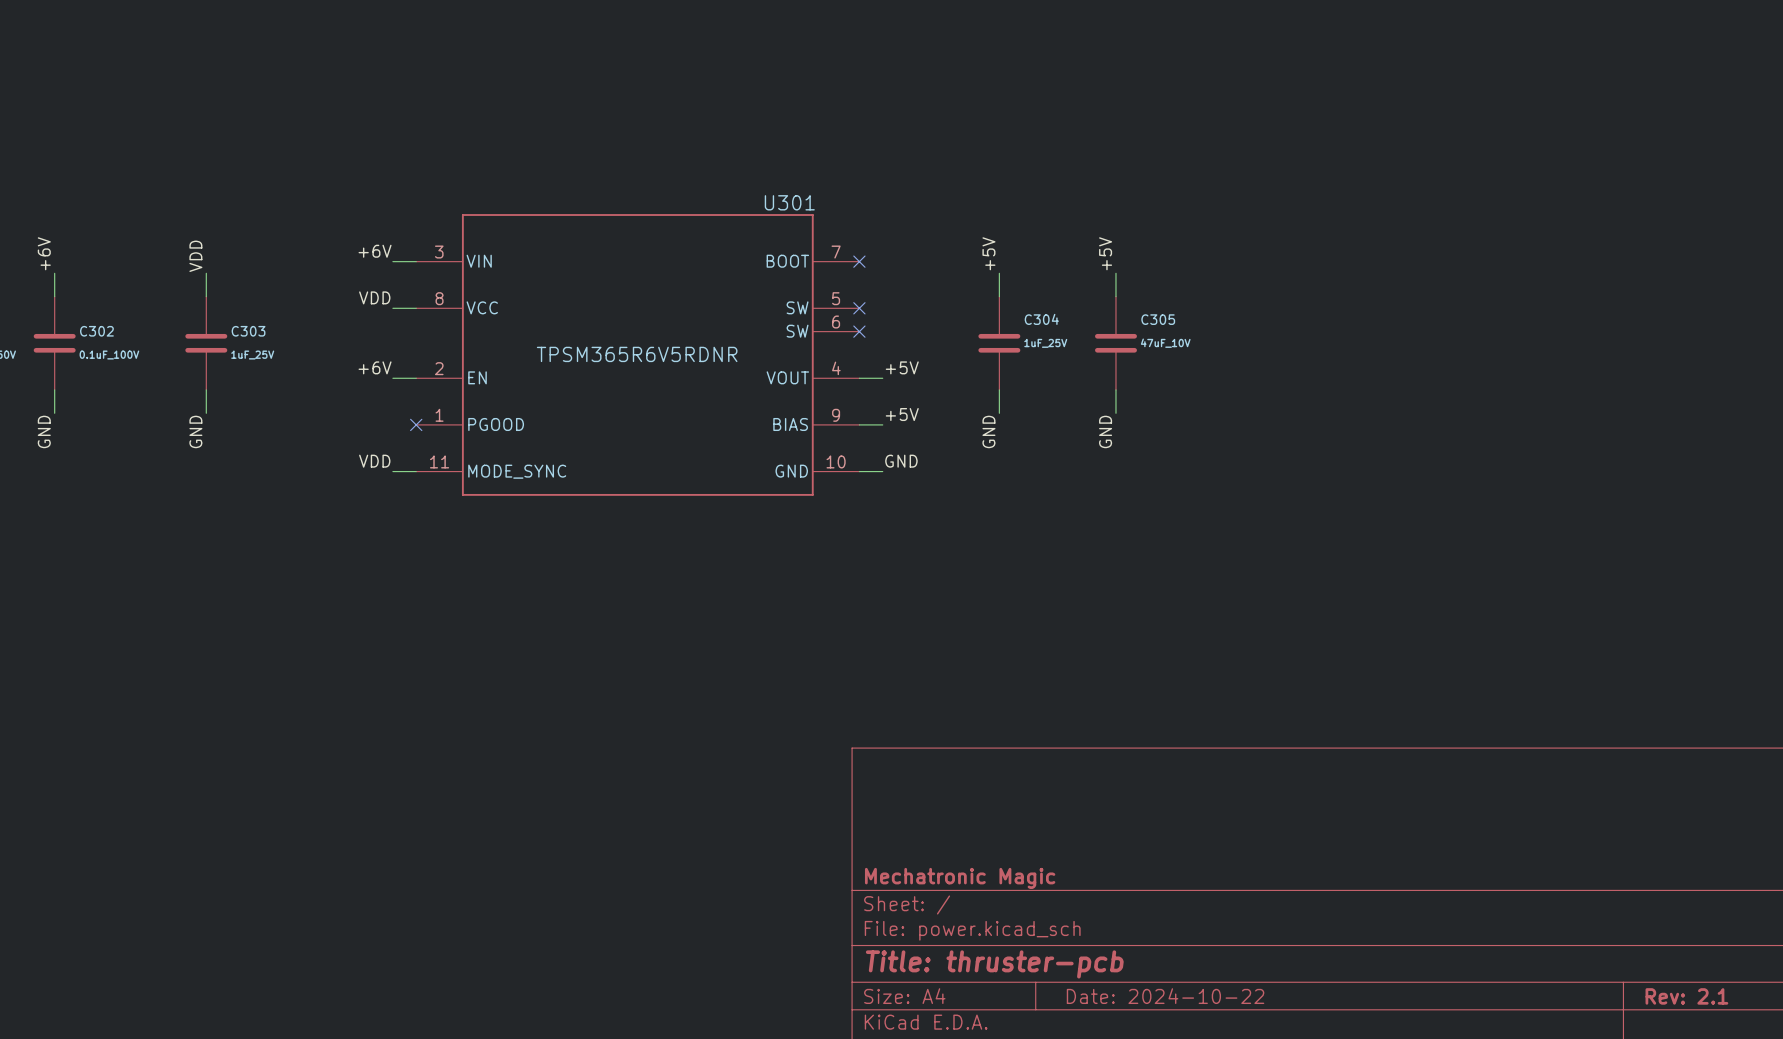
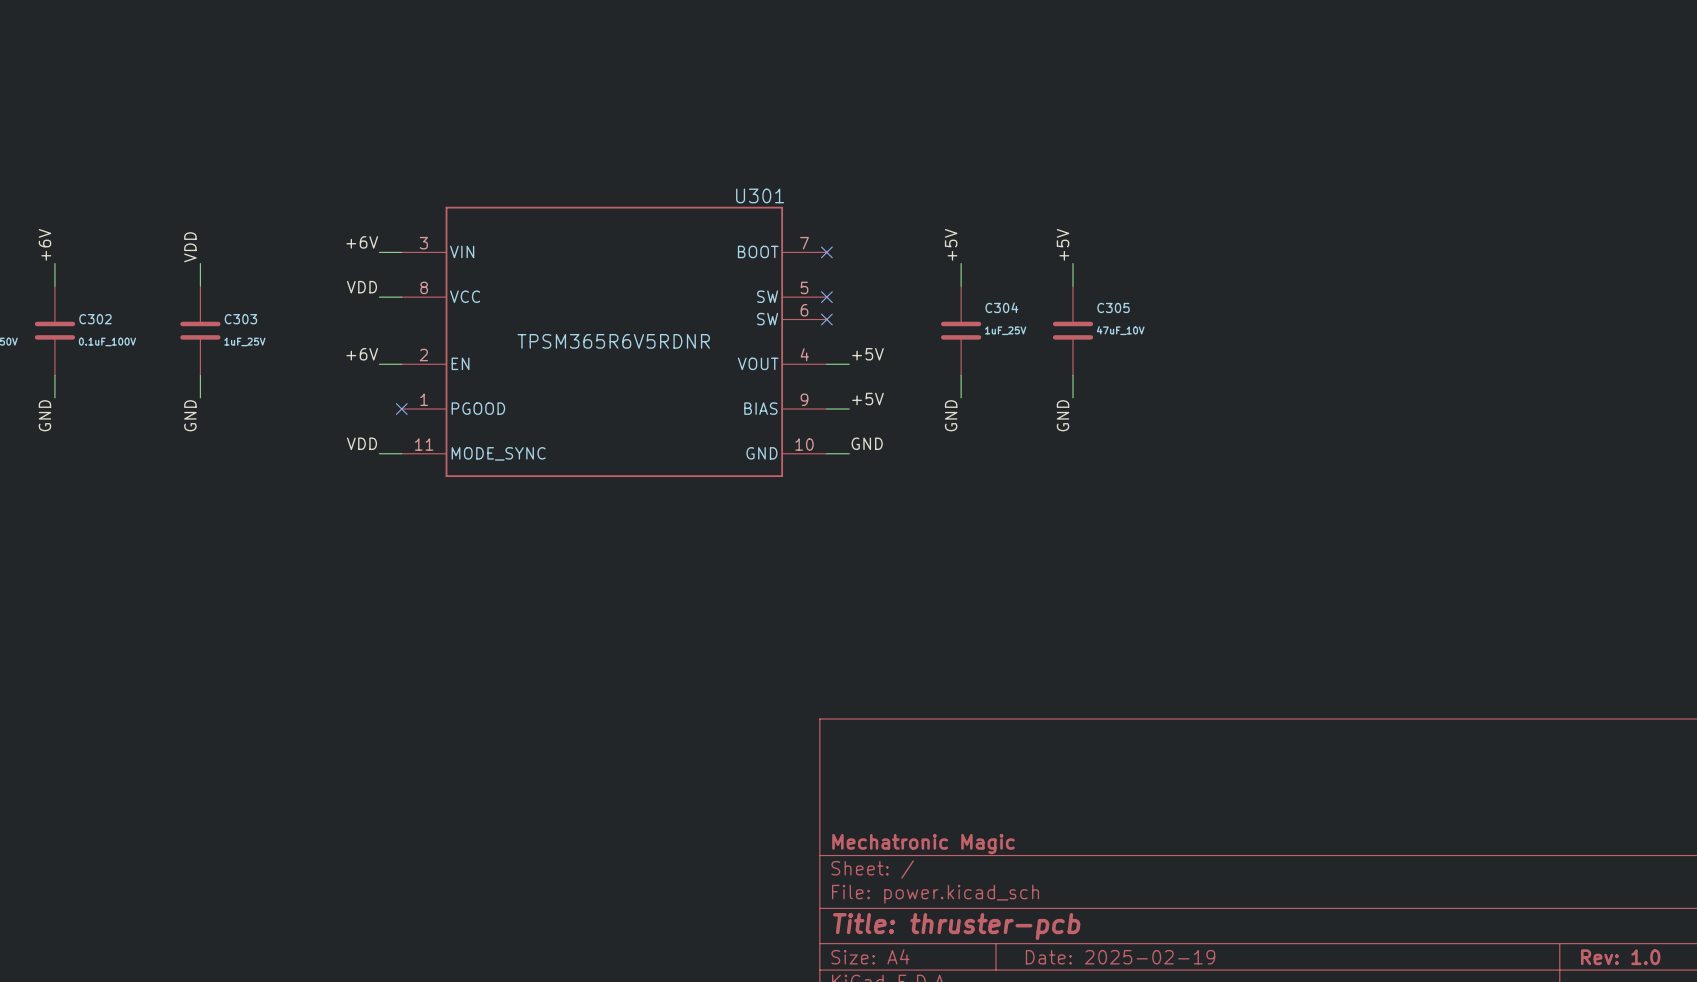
title block: Date: 2024-10-22 (1165, 996) -> Date: 2025-02-19 (1120, 957)
title block: Rev: 2.1 (1686, 996) -> Rev: 1.0 (1620, 957)

